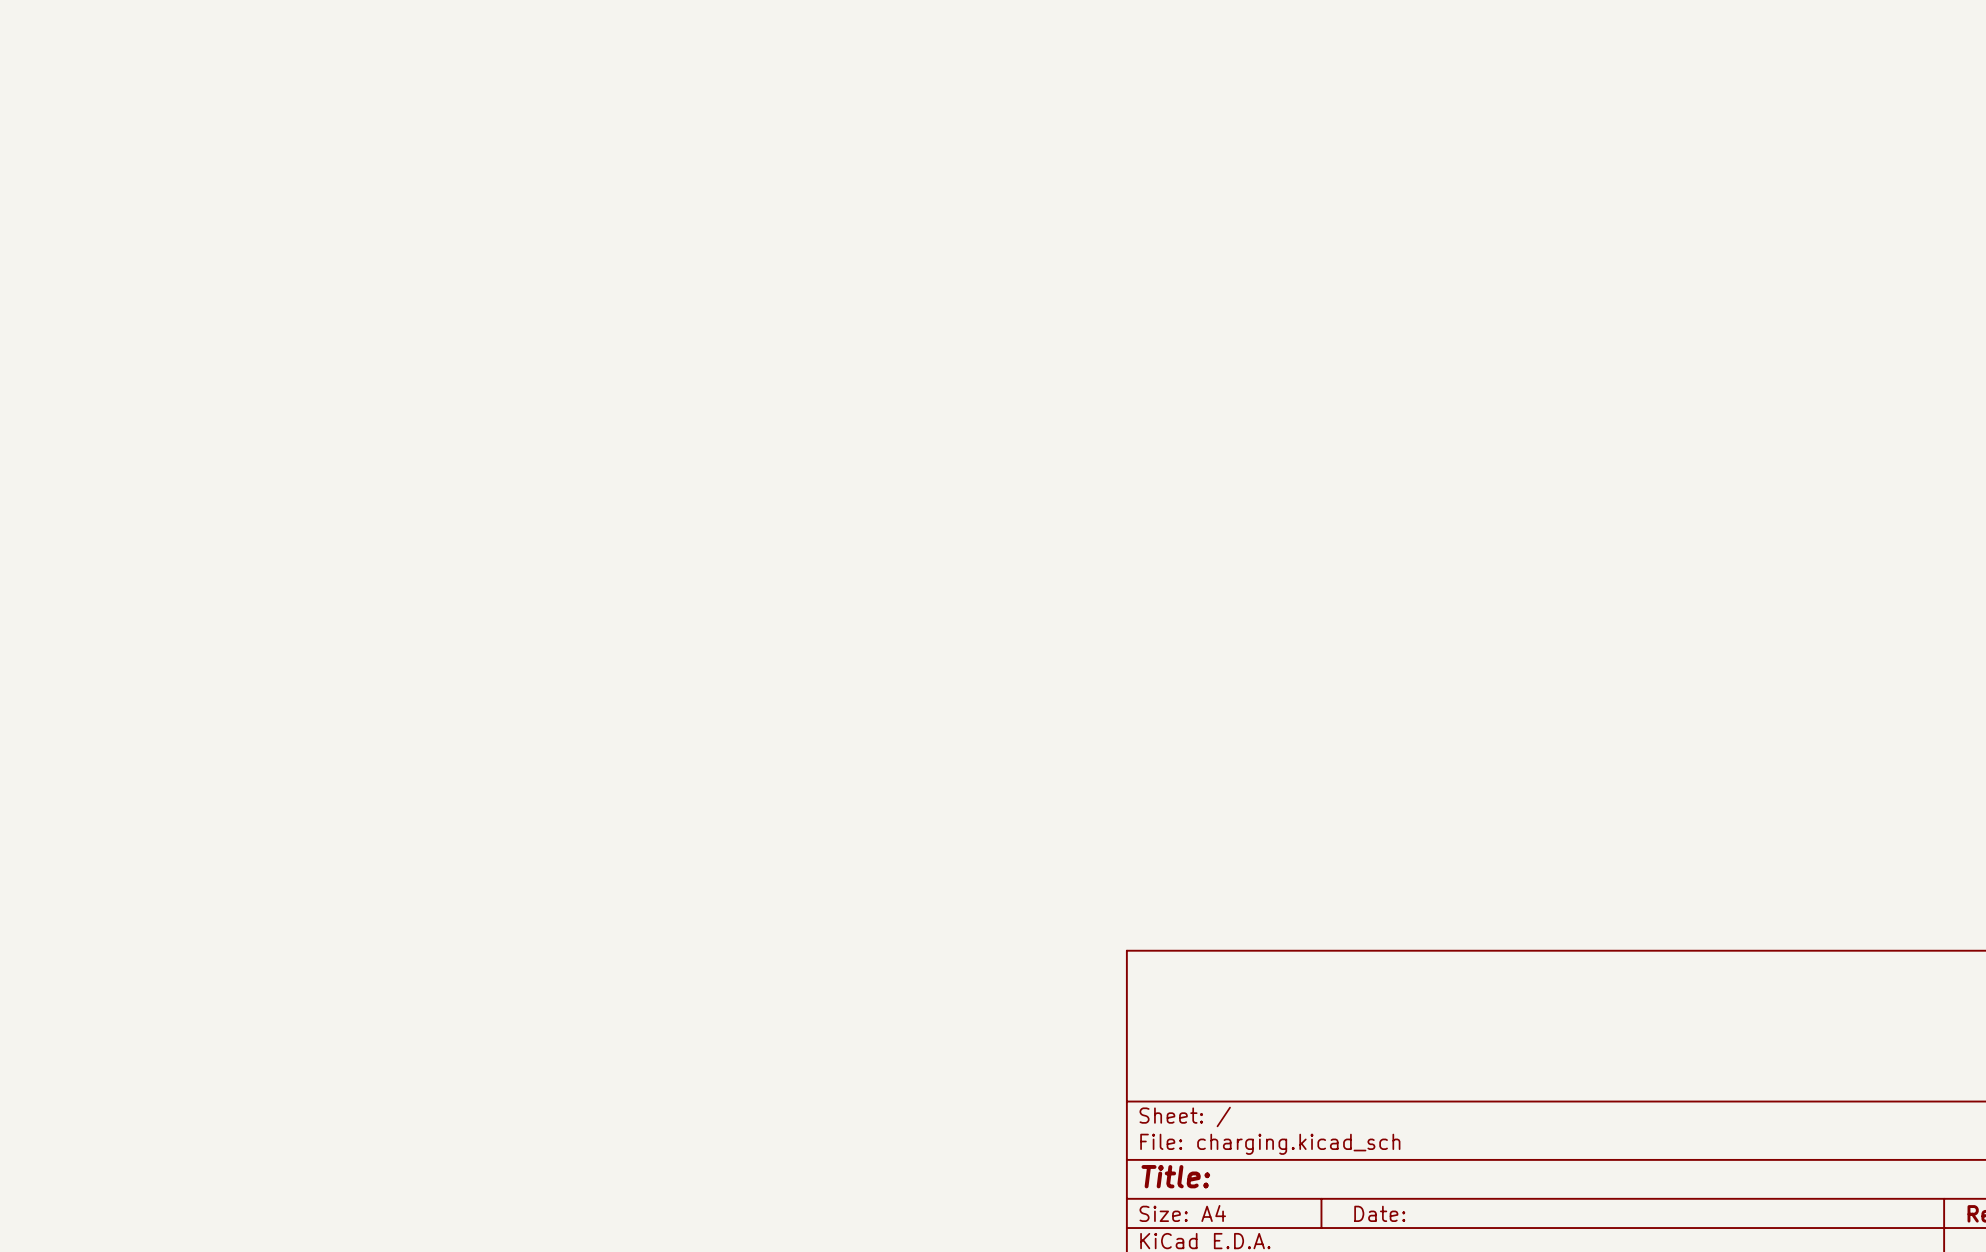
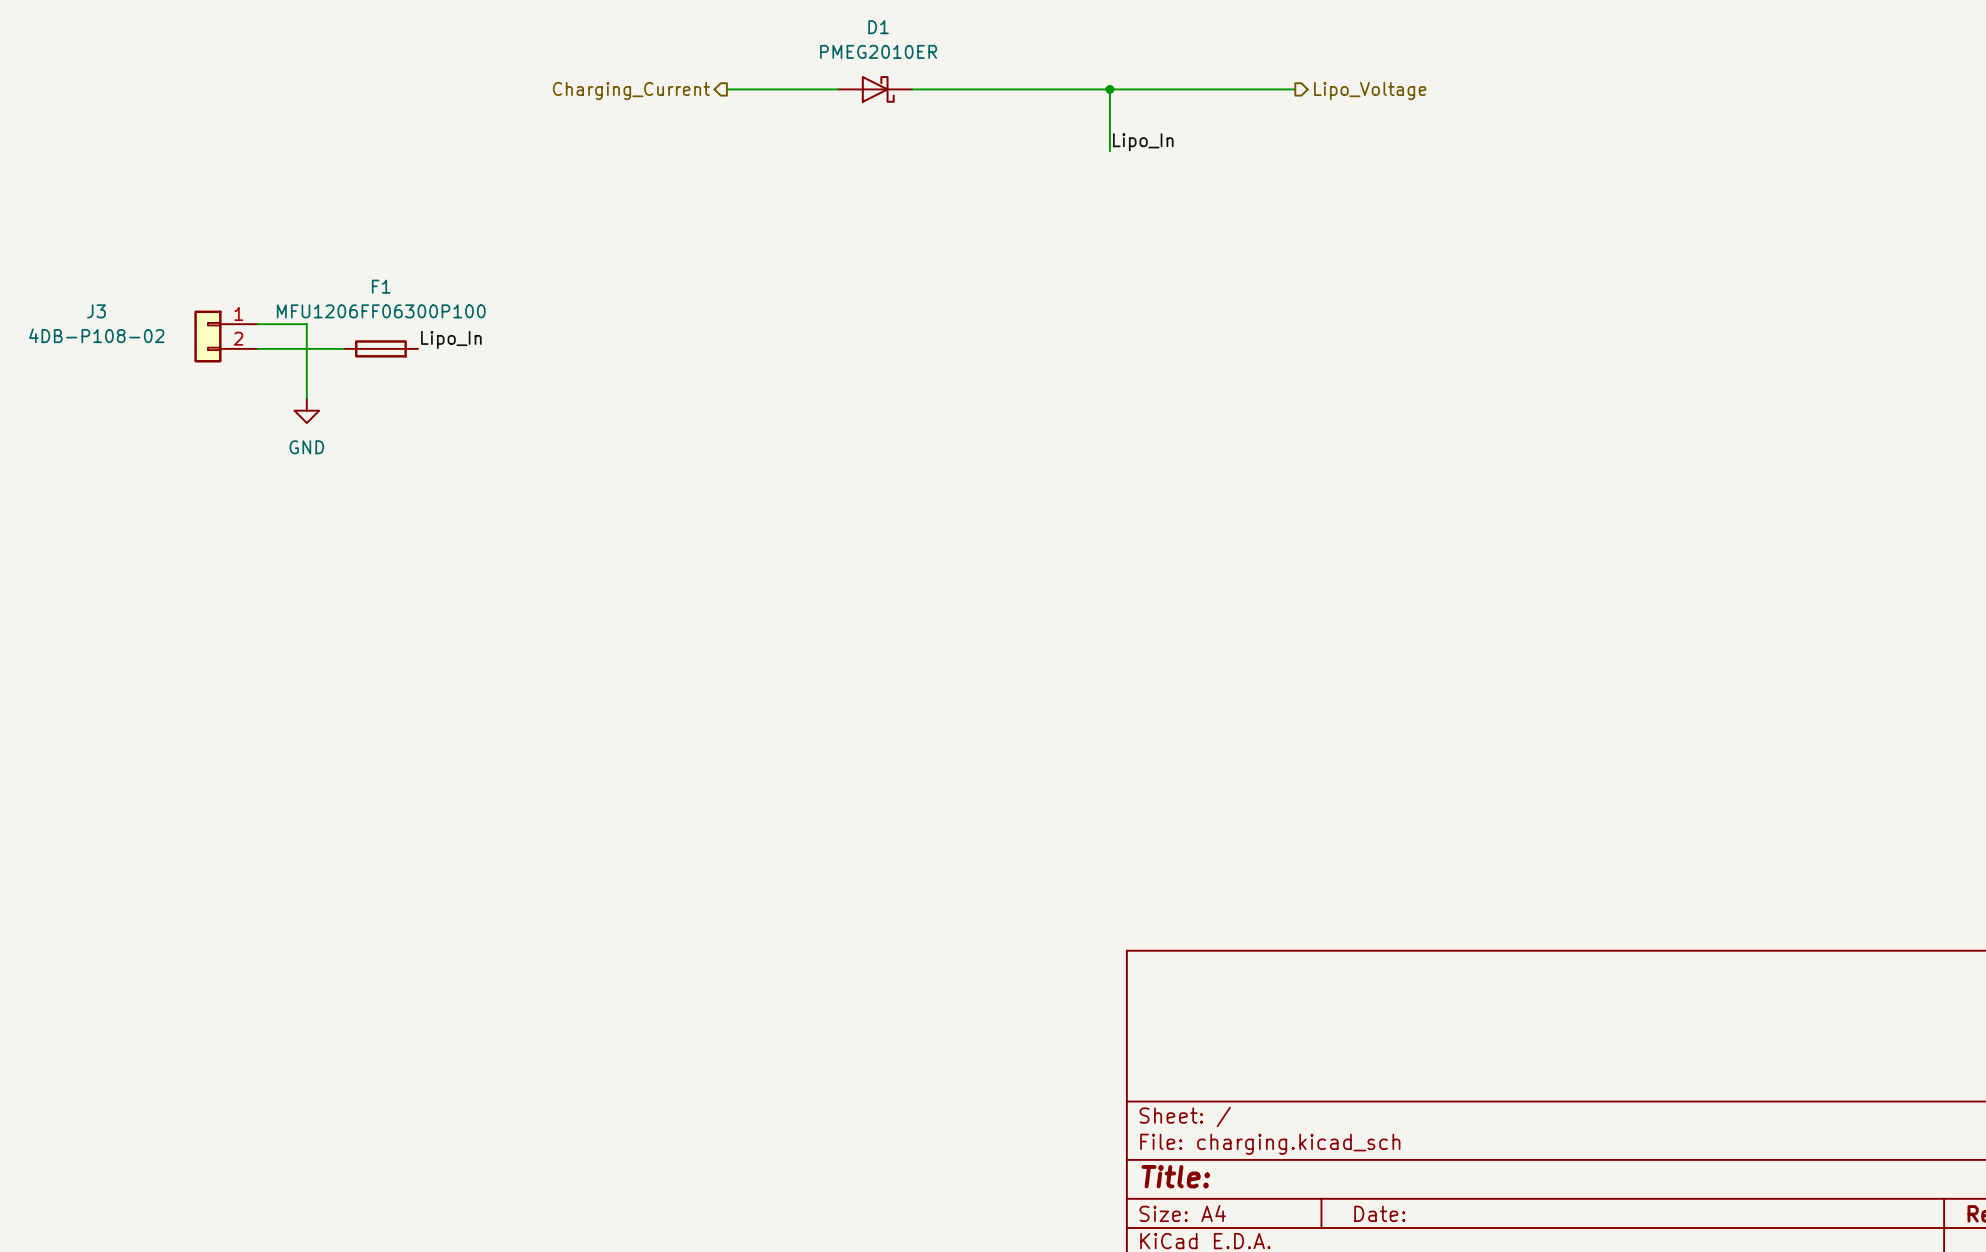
wire: none -> (726, 89) (838, 89)
D1: none -> PMEG2010ER (875, 89)
wire: none -> (912, 89) (1295, 89)
wire: none -> (1109, 89) (1109, 151)
junction: none -> (1109, 89)
hierarchical label: none -> Charging_Current (631, 91)
hierarchical label: none -> Lipo_Voltage (1370, 91)
label: none -> Lipo_In (1143, 142)
wire: none -> (257, 324) (306, 324) (306, 398)
J3: none -> 4DB-P108-02 (225, 336)
label: none -> Lipo_In (451, 339)
wire: none -> (257, 348) (343, 348)
F1: none -> MFU1206FF06300P100 (380, 348)
power symbol: none -> GND (306, 410)

